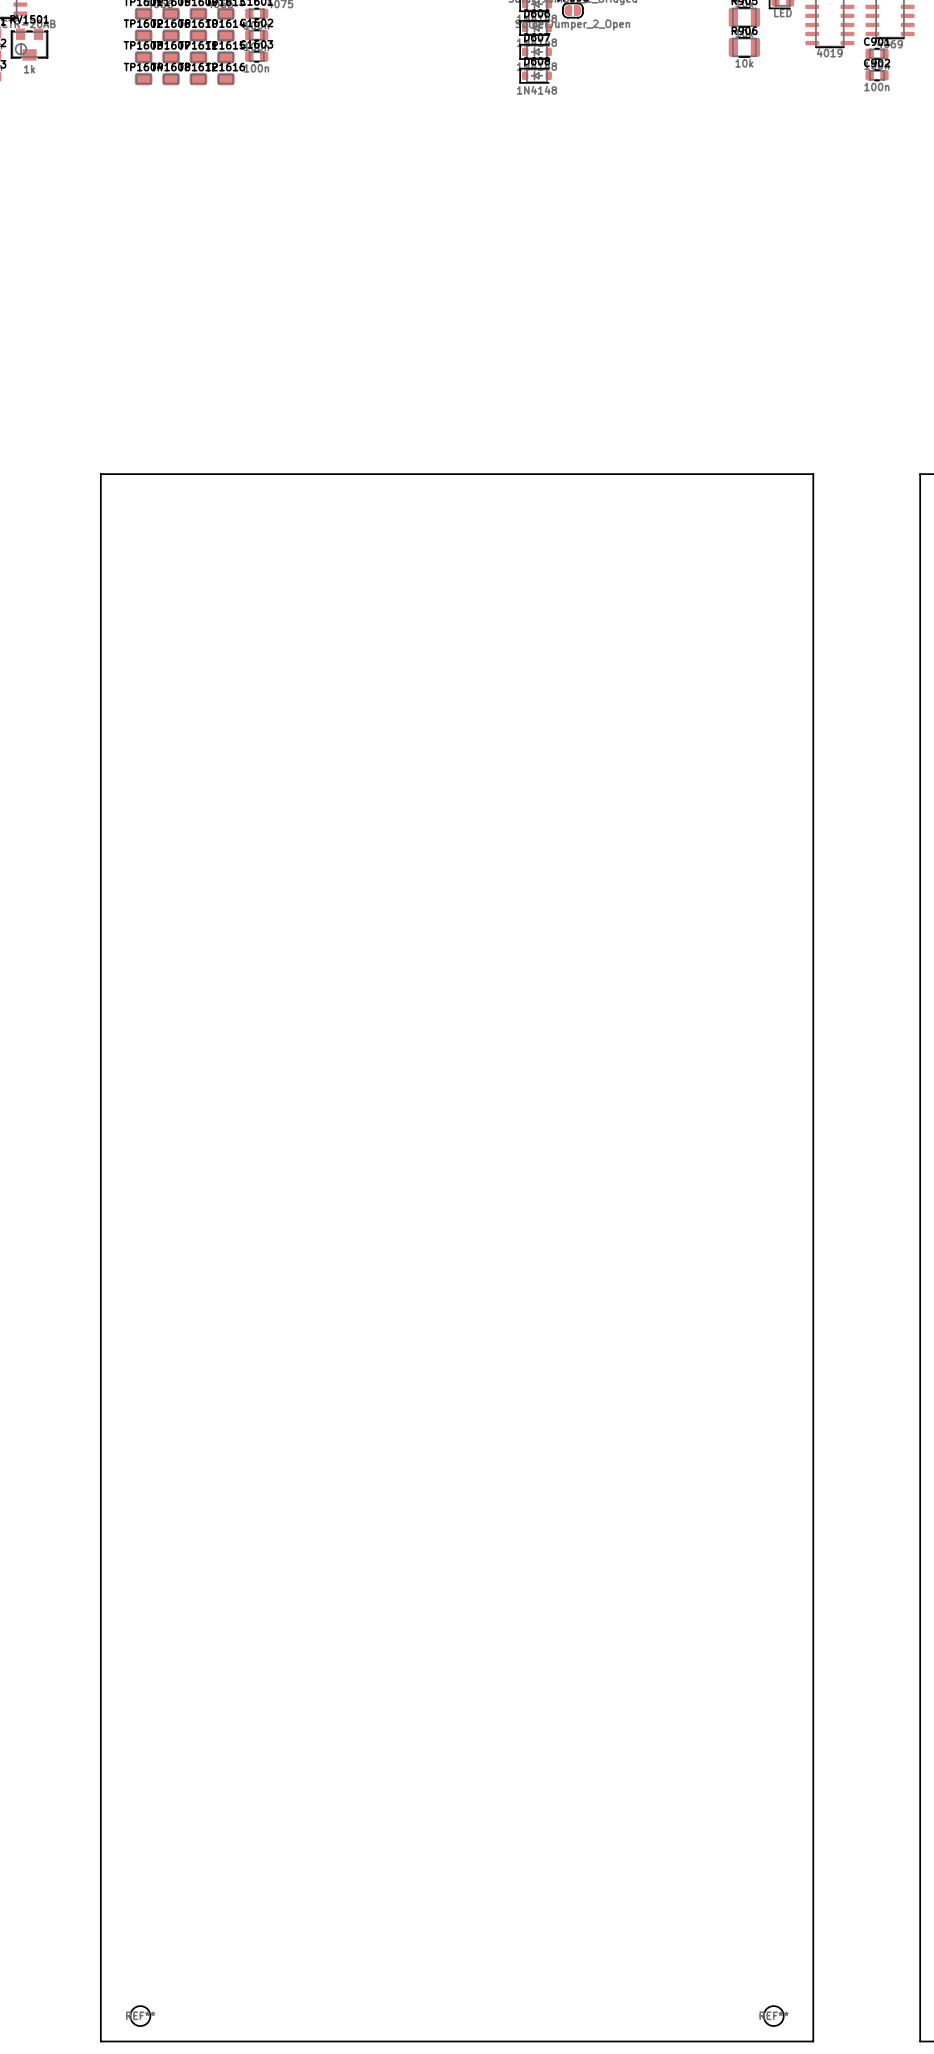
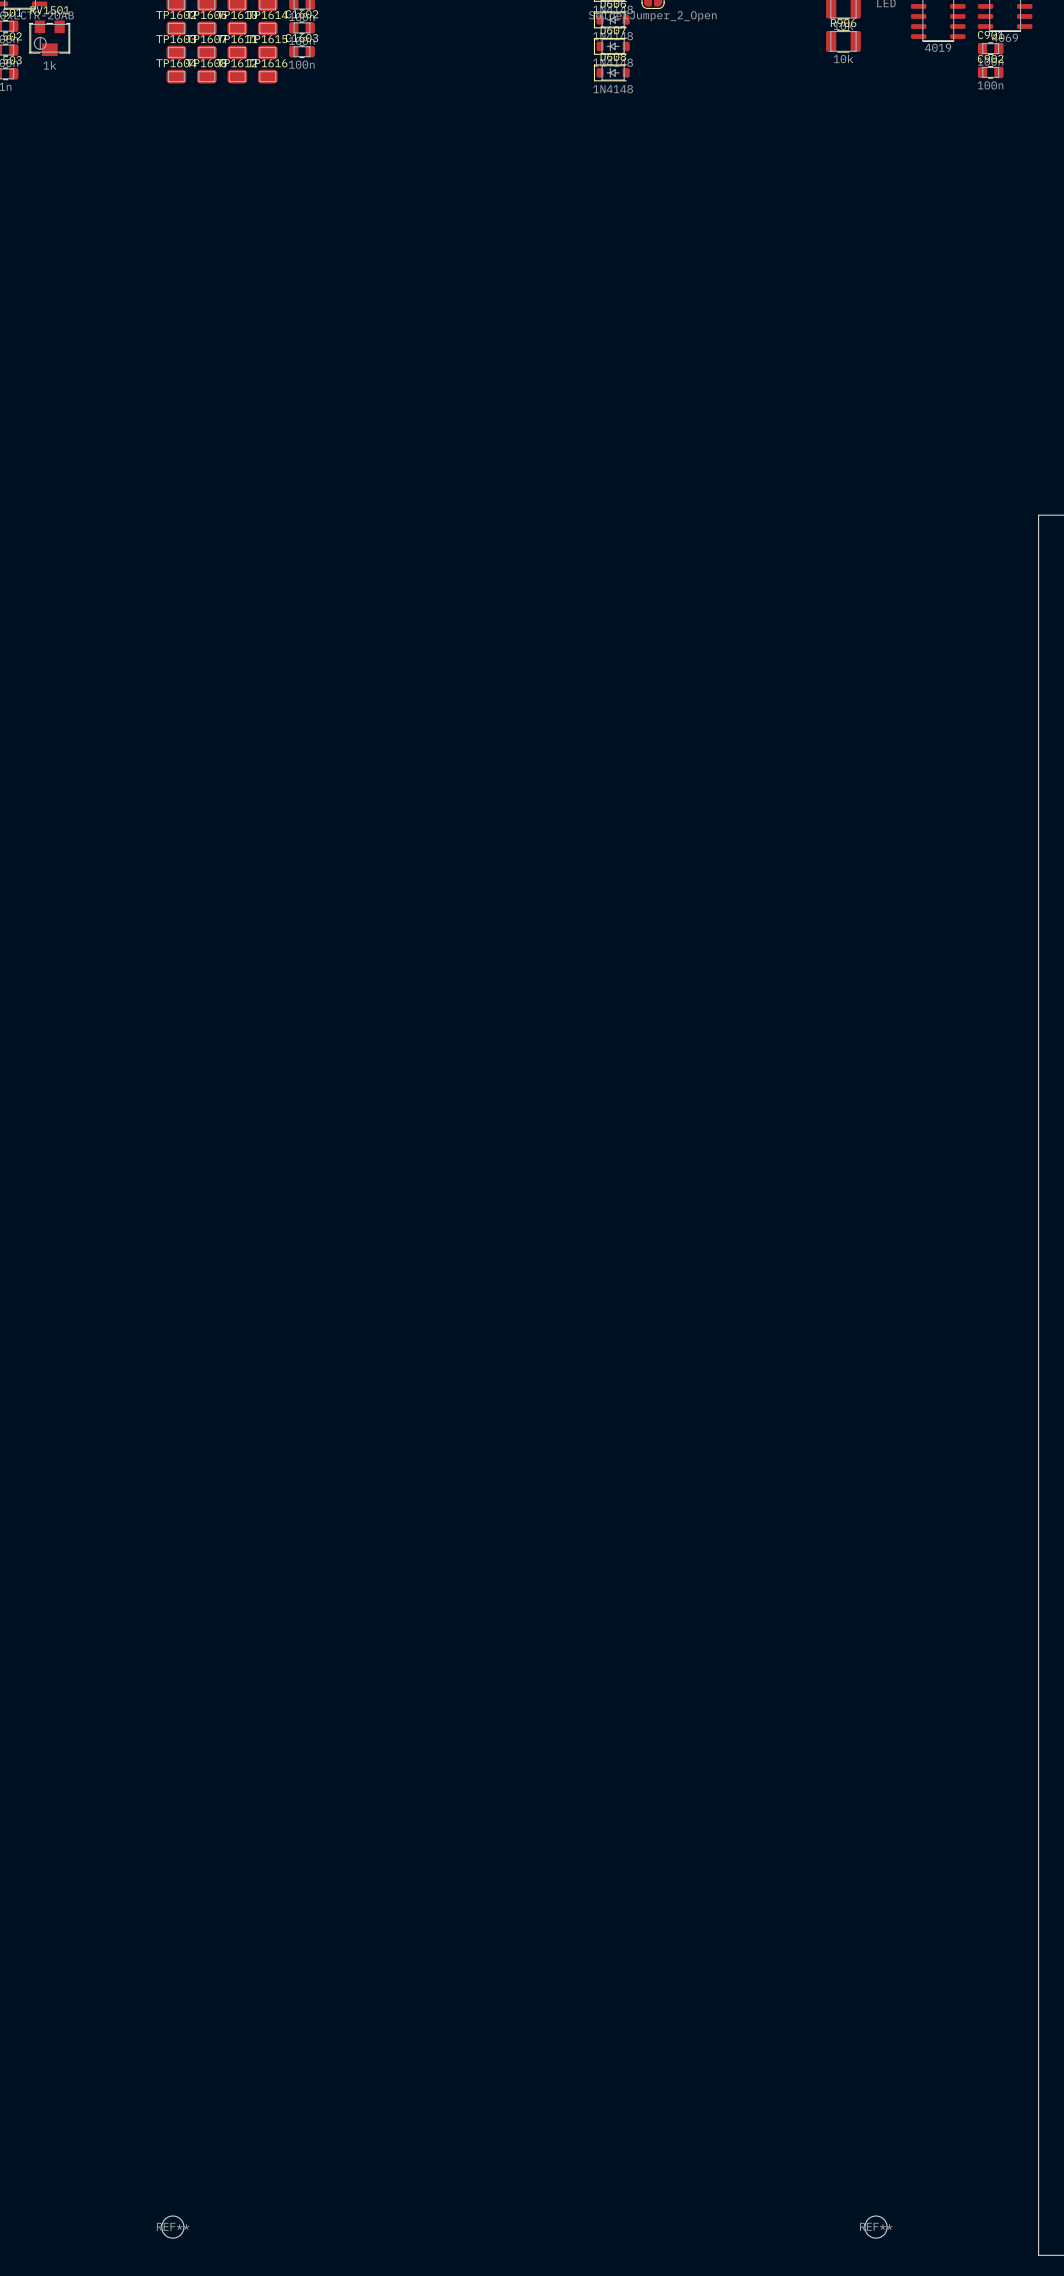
board edge: (100, 474) (813, 474) (813, 2041) (100, 2041) (100, 474) -> none

